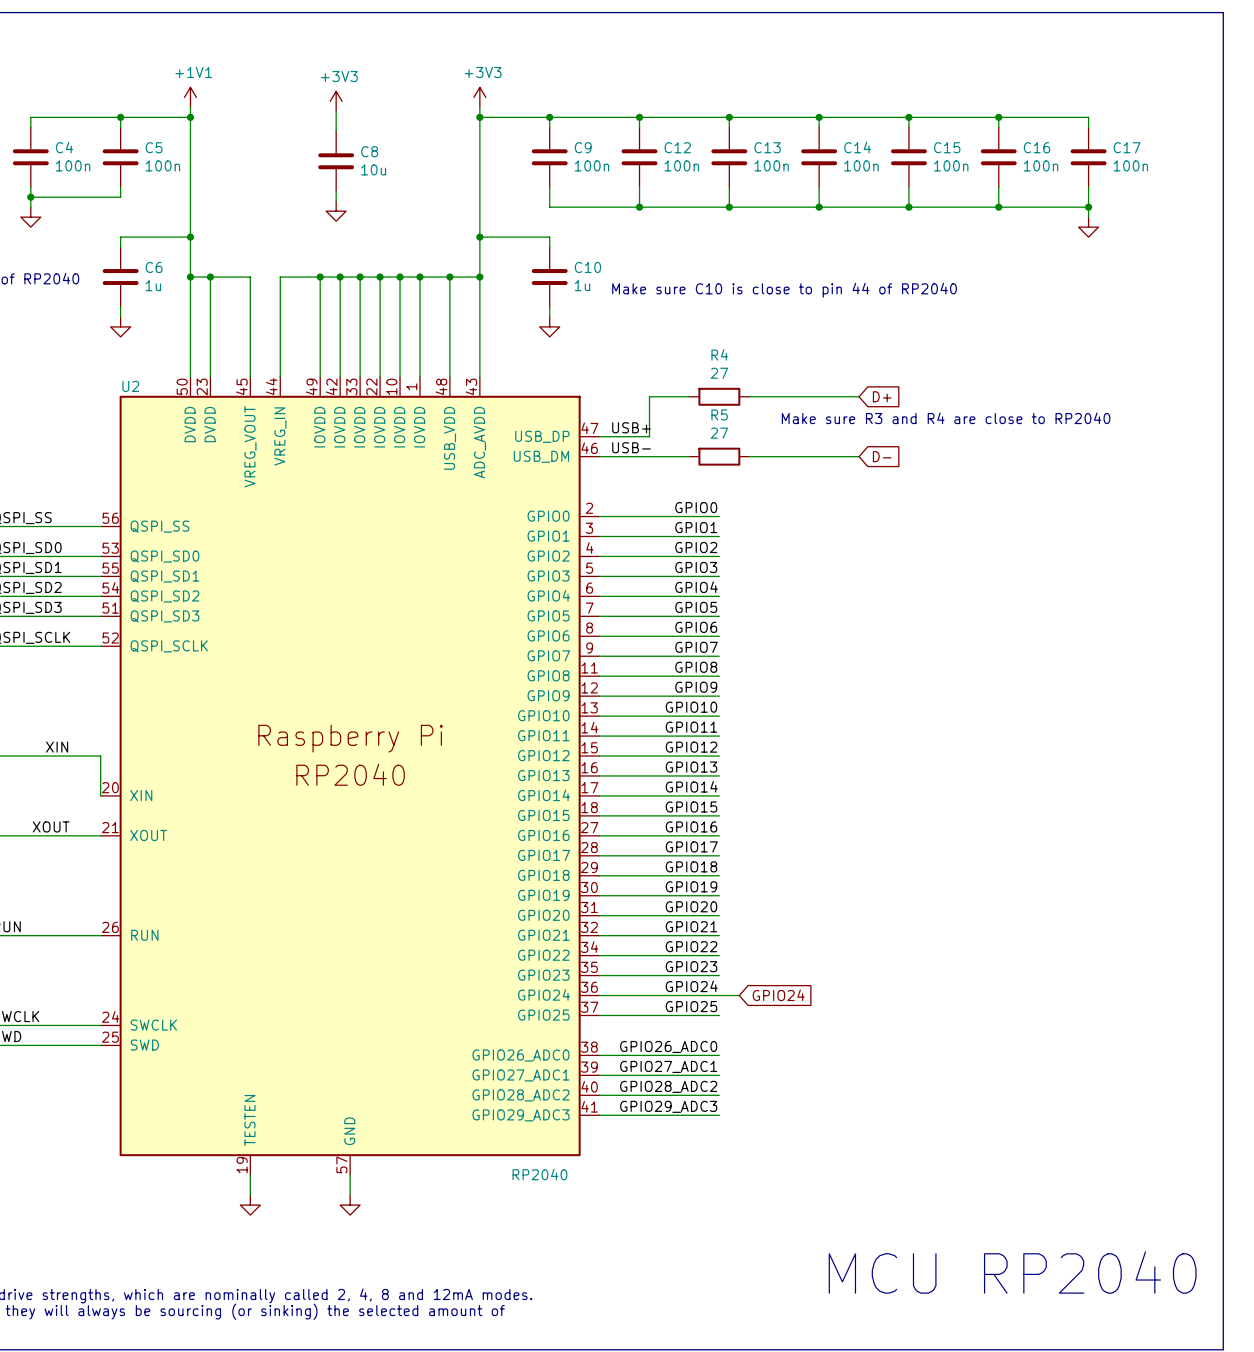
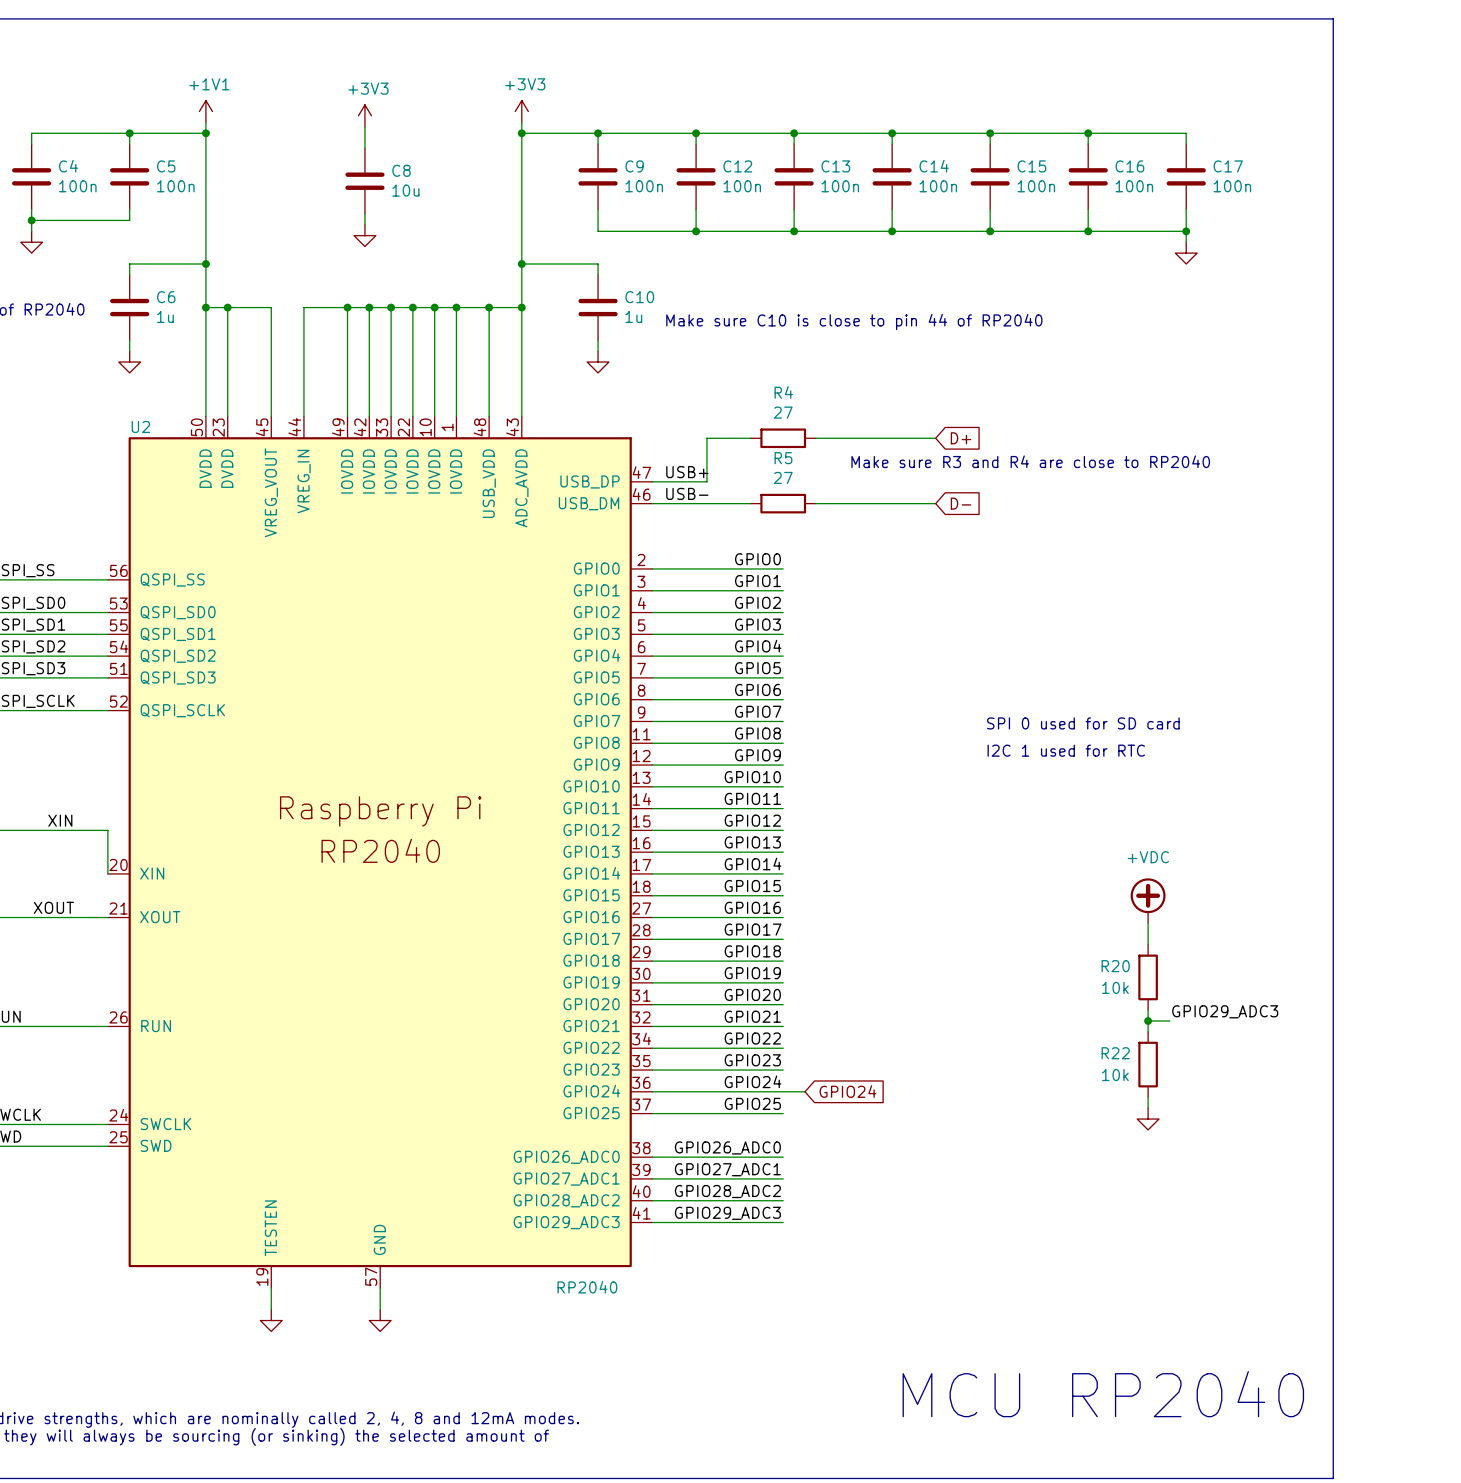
text: none -> SPI 0 used for SD card (1083, 723)
text: none -> I2C 1 used for RTC (1066, 750)
power symbol: none -> +VDC (1148, 900)
wire: none -> (1148, 922) (1148, 944)
R20: none -> 10k (1148, 977)
wire: none -> (1148, 1010) (1148, 1031)
label: none -> GPIO29_ADC3 (1225, 1011)
wire: none -> (1148, 1021) (1169, 1021)
junction: none -> (1148, 1021)
R22: none -> 10k (1148, 1064)
wire: none -> (1148, 1097) (1148, 1108)
power symbol: none -> (1148, 1119)

